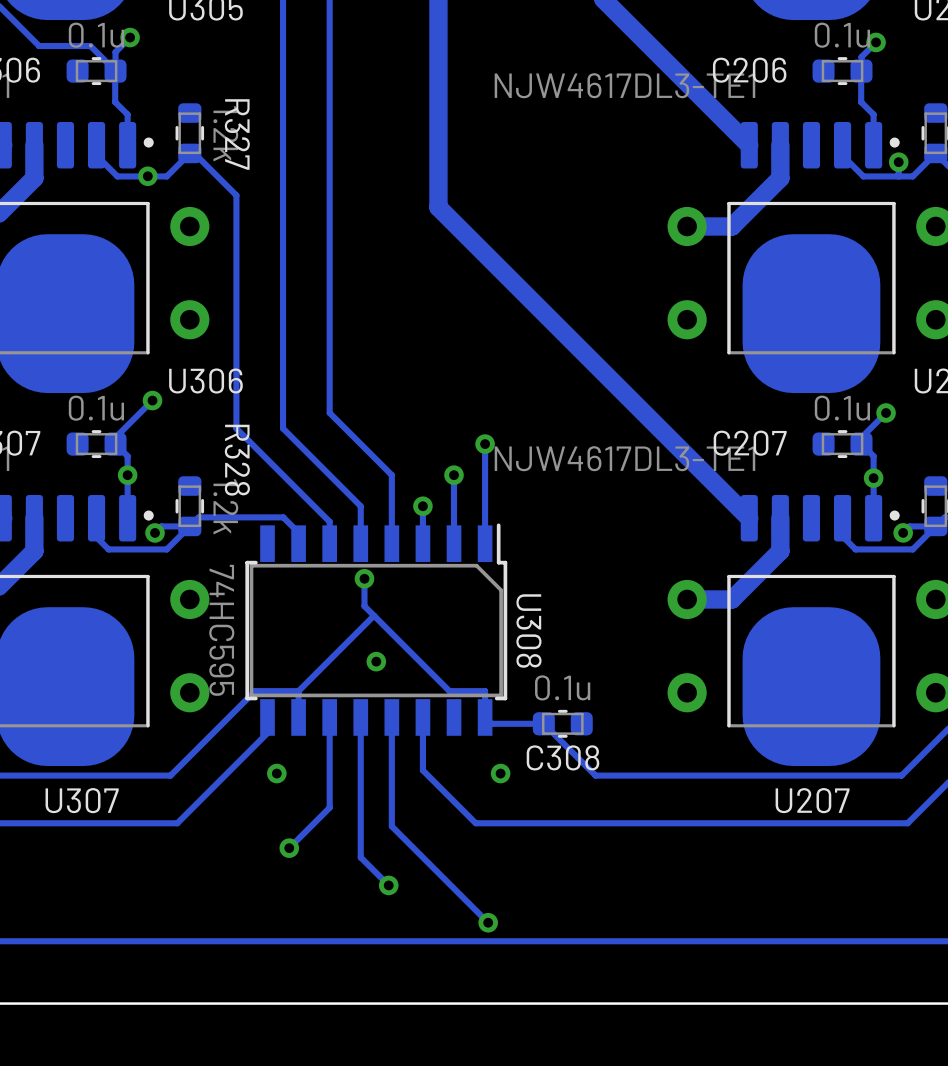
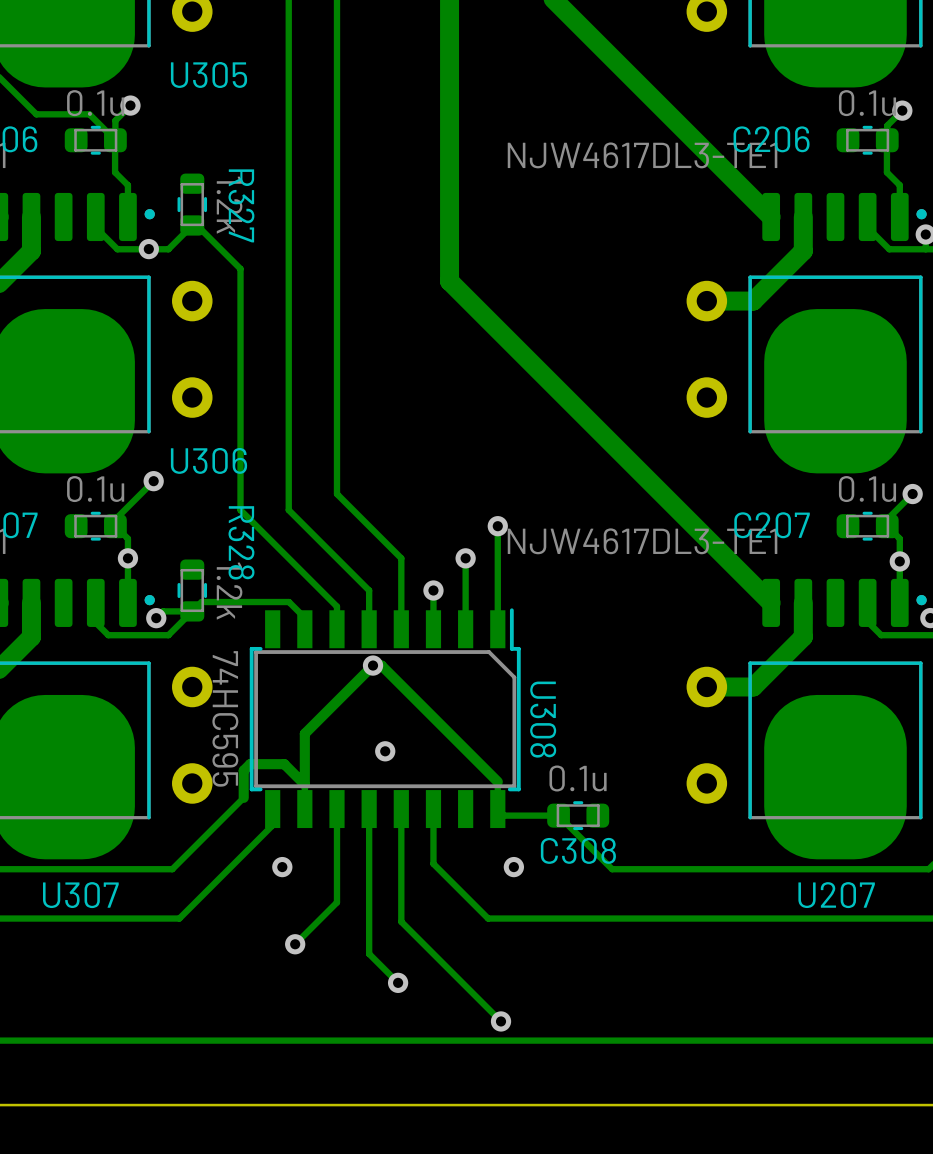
track: (364, 578) (364, 606) (449, 691) (485, 691) -> (304, 781) (304, 733) (373, 665) (381, 665) (497, 781)
track: (374, 615) (298, 691) (255, 691) (239, 706) -> (304, 784) (284, 764) (250, 764) (243, 770) (243, 797)

